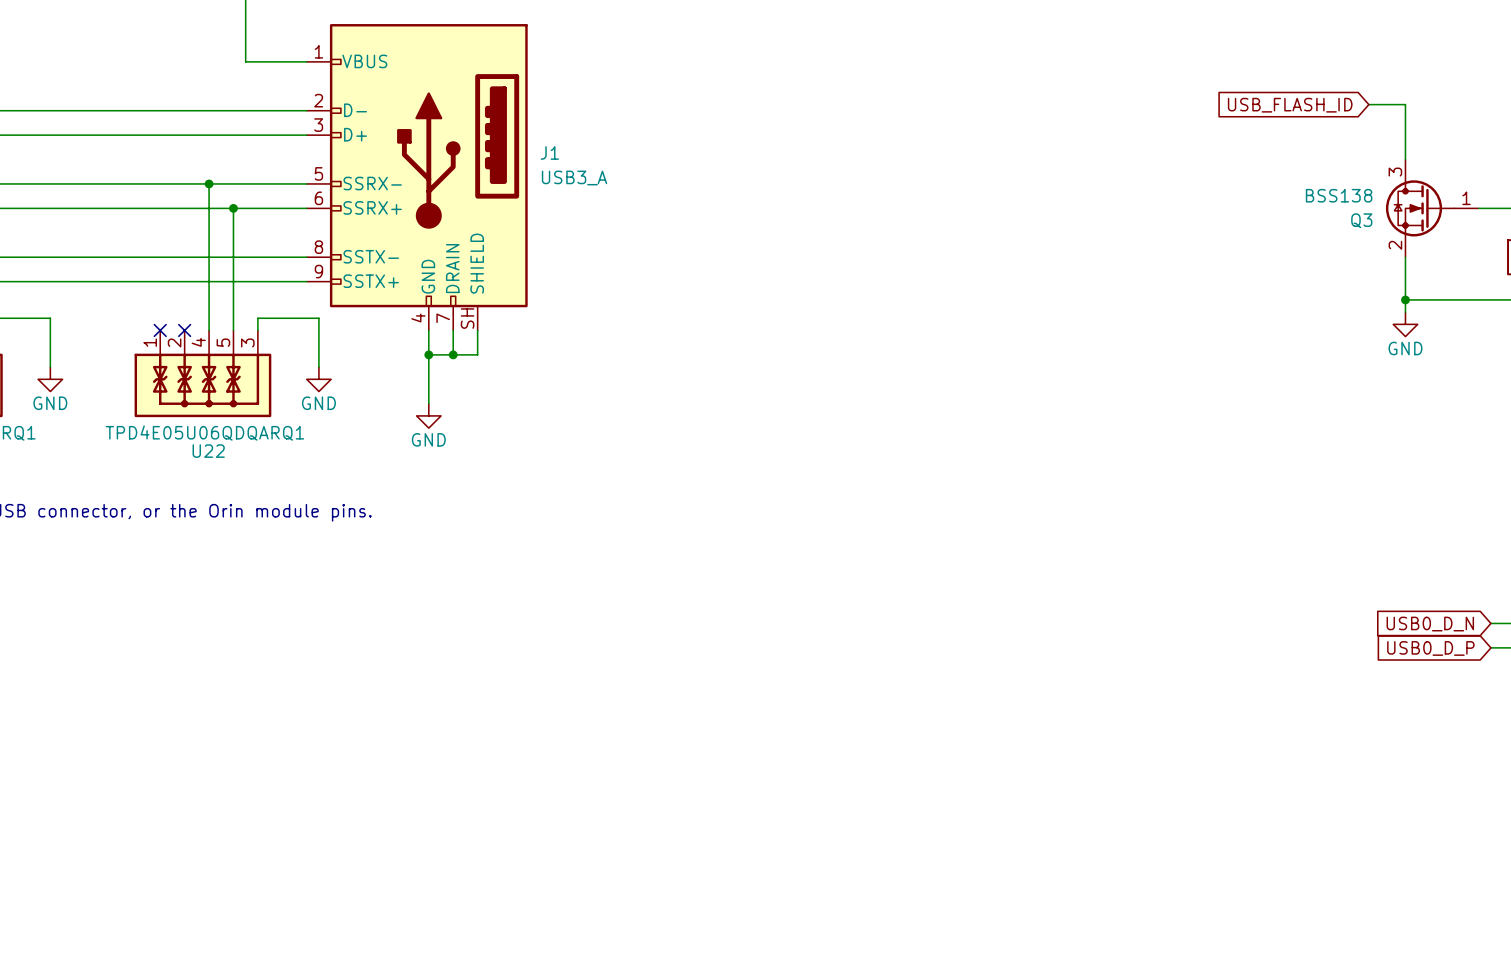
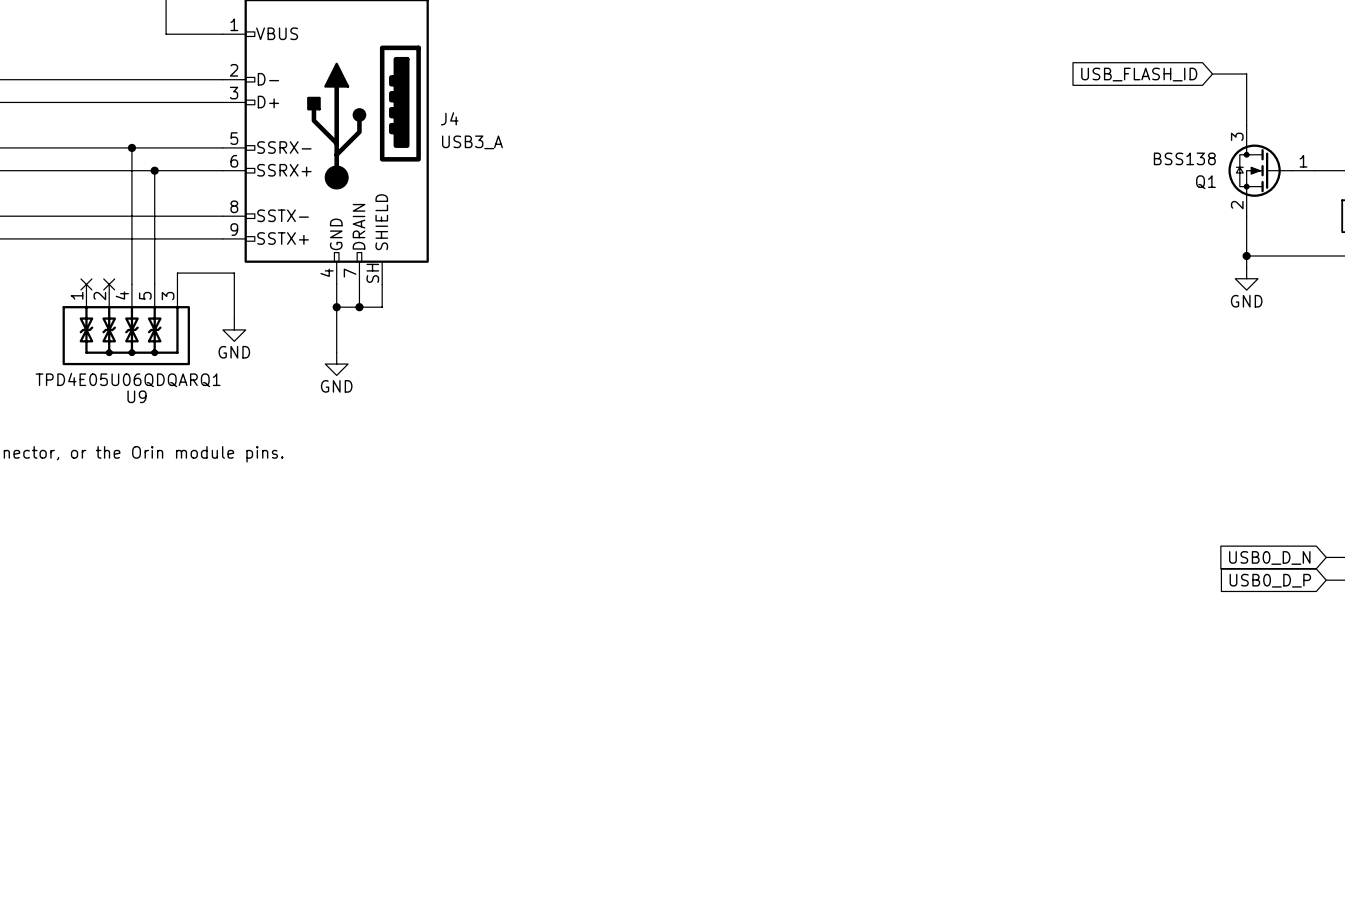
J1 name: J1 (549, 152) -> J4 (449, 118)
Q3 name: Q3 (1361, 220) -> Q1 (1205, 182)
U22 name: U22 (208, 451) -> U9 (137, 396)

